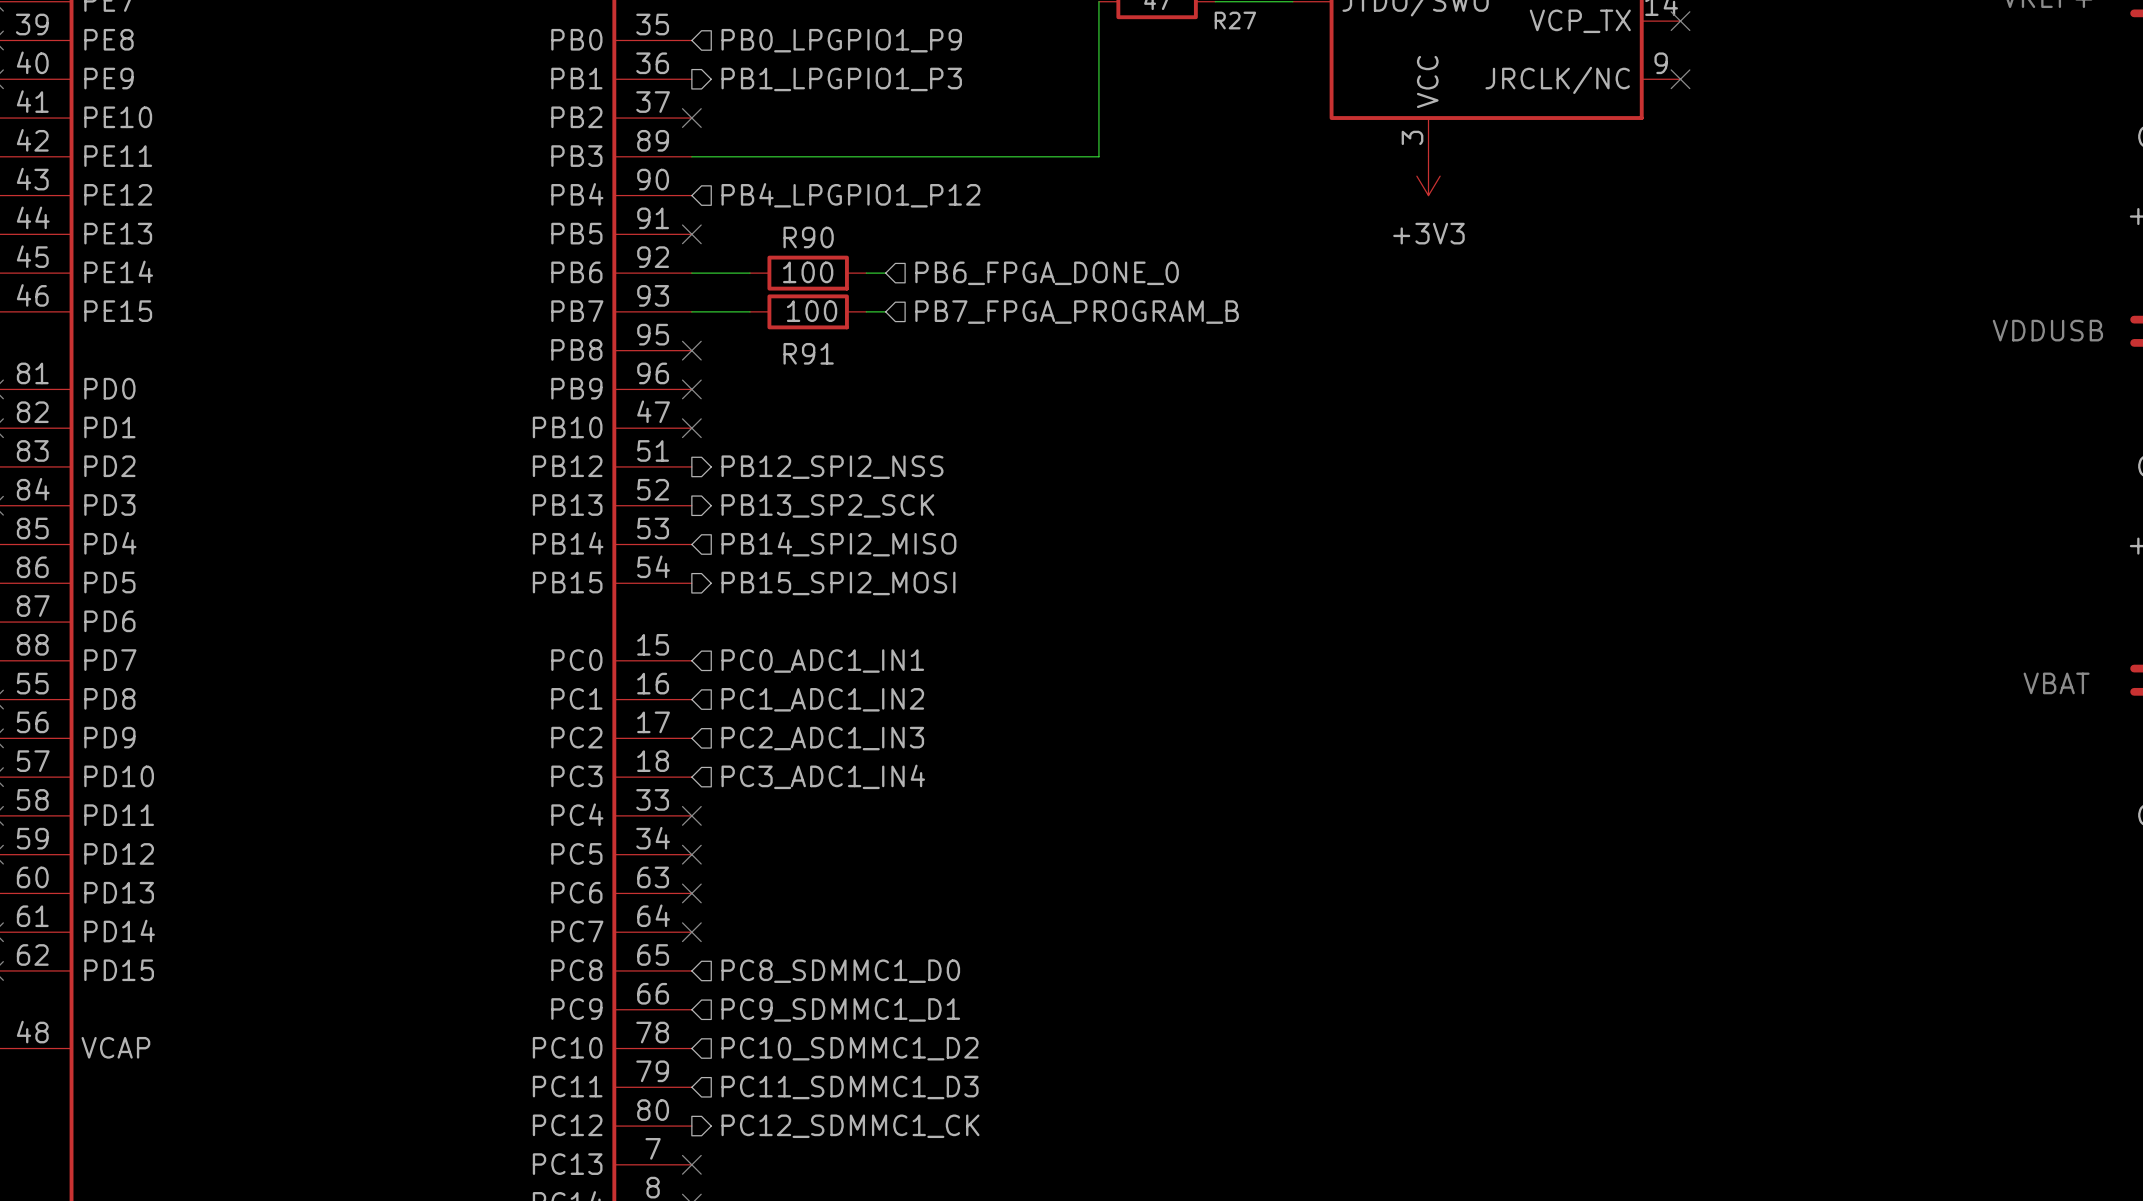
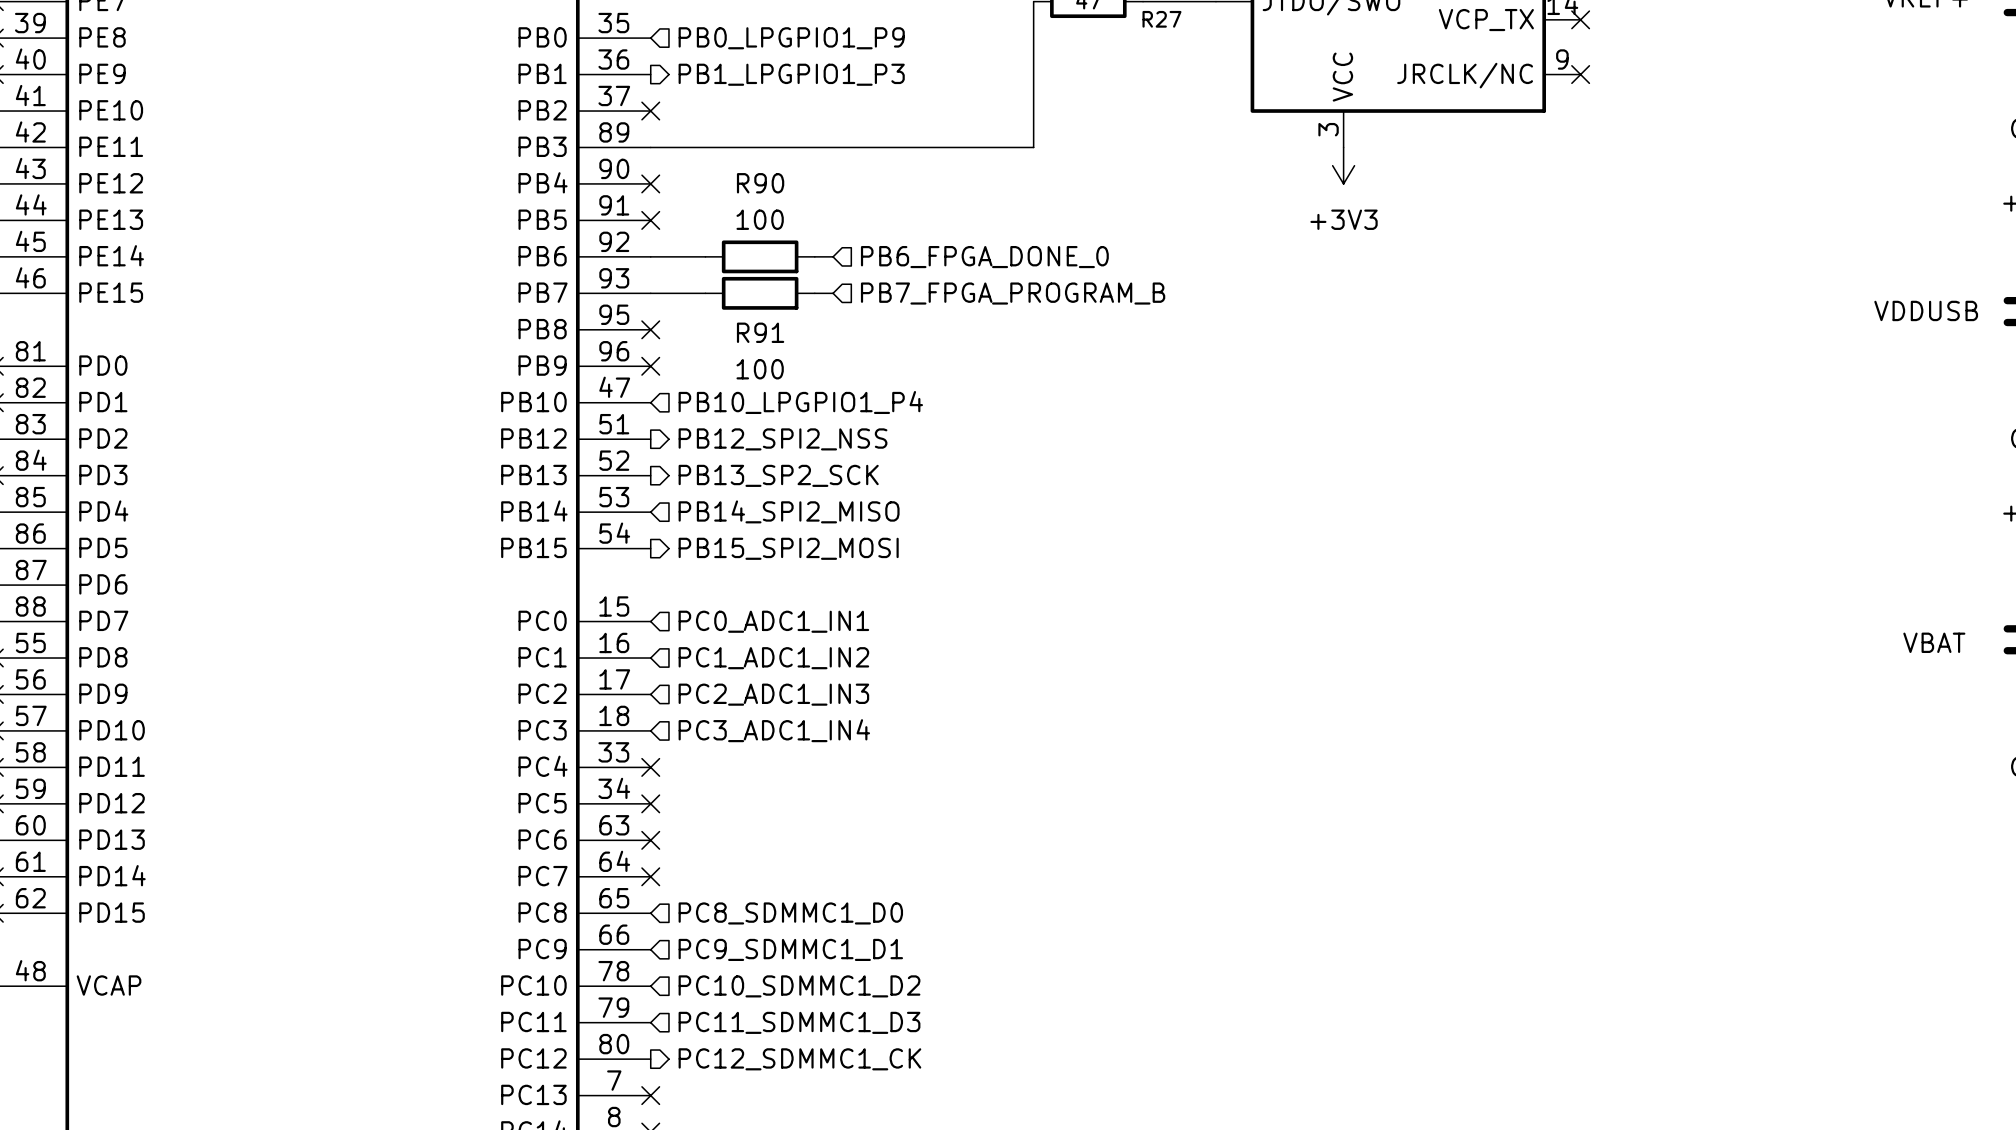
no-connect mark: none -> (650, 183)
hierarchical label: PB4_LPGPIO1_P12 (850, 195) -> none
R90 name position: R90 (808, 237) -> R90 (760, 183)
R90 value position: 100 (808, 272) -> 100 (760, 219)
R91 value position: 100 (812, 311) -> 100 (760, 369)
hierarchical label: none -> PB10_LPGPIO1_P4 (800, 402)
no-connect mark: (691, 428) -> none

